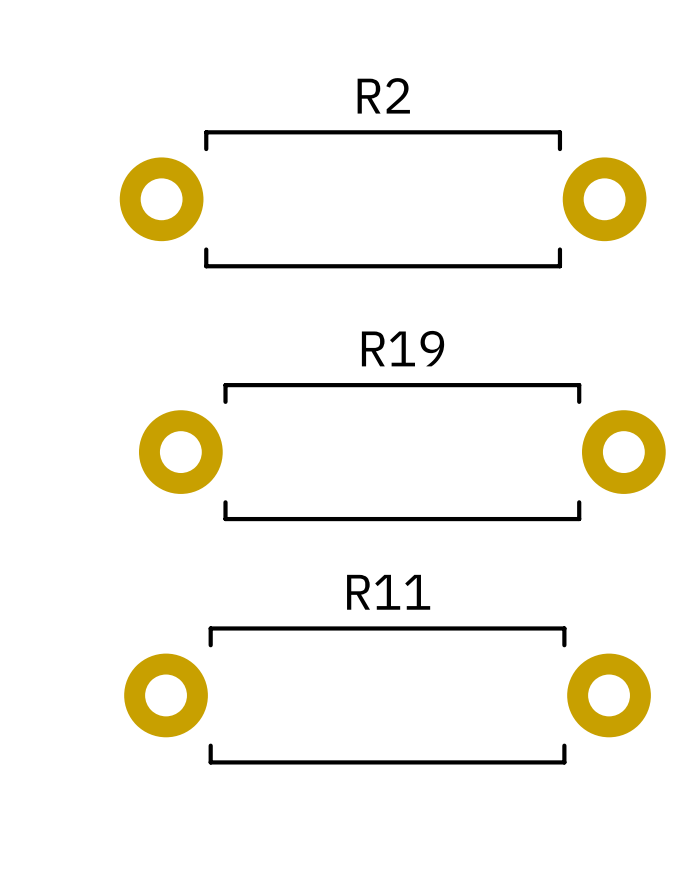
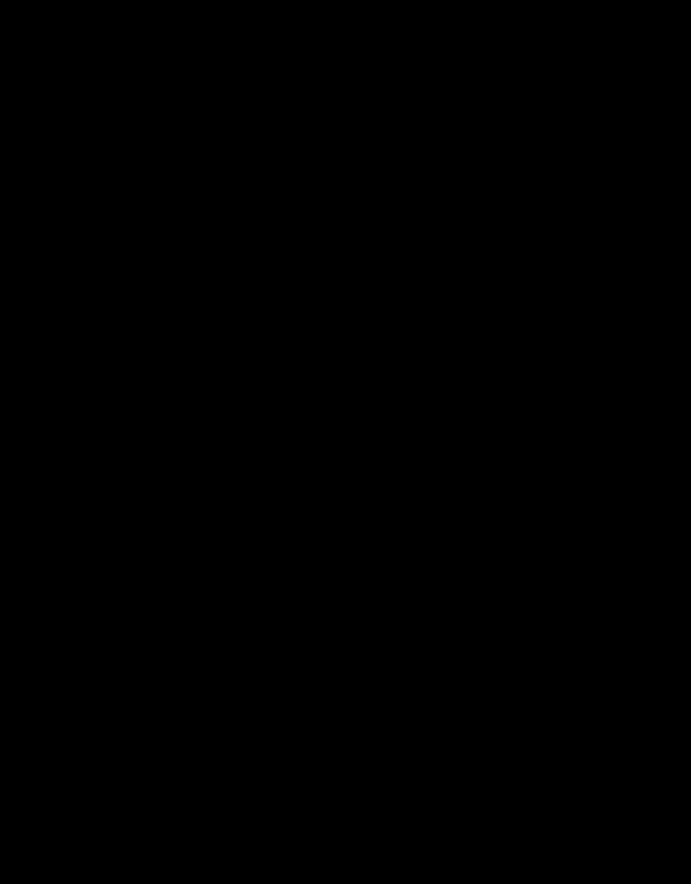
R2: (383, 199) -> none
R19: (402, 452) -> none
R11: (387, 695) -> none

